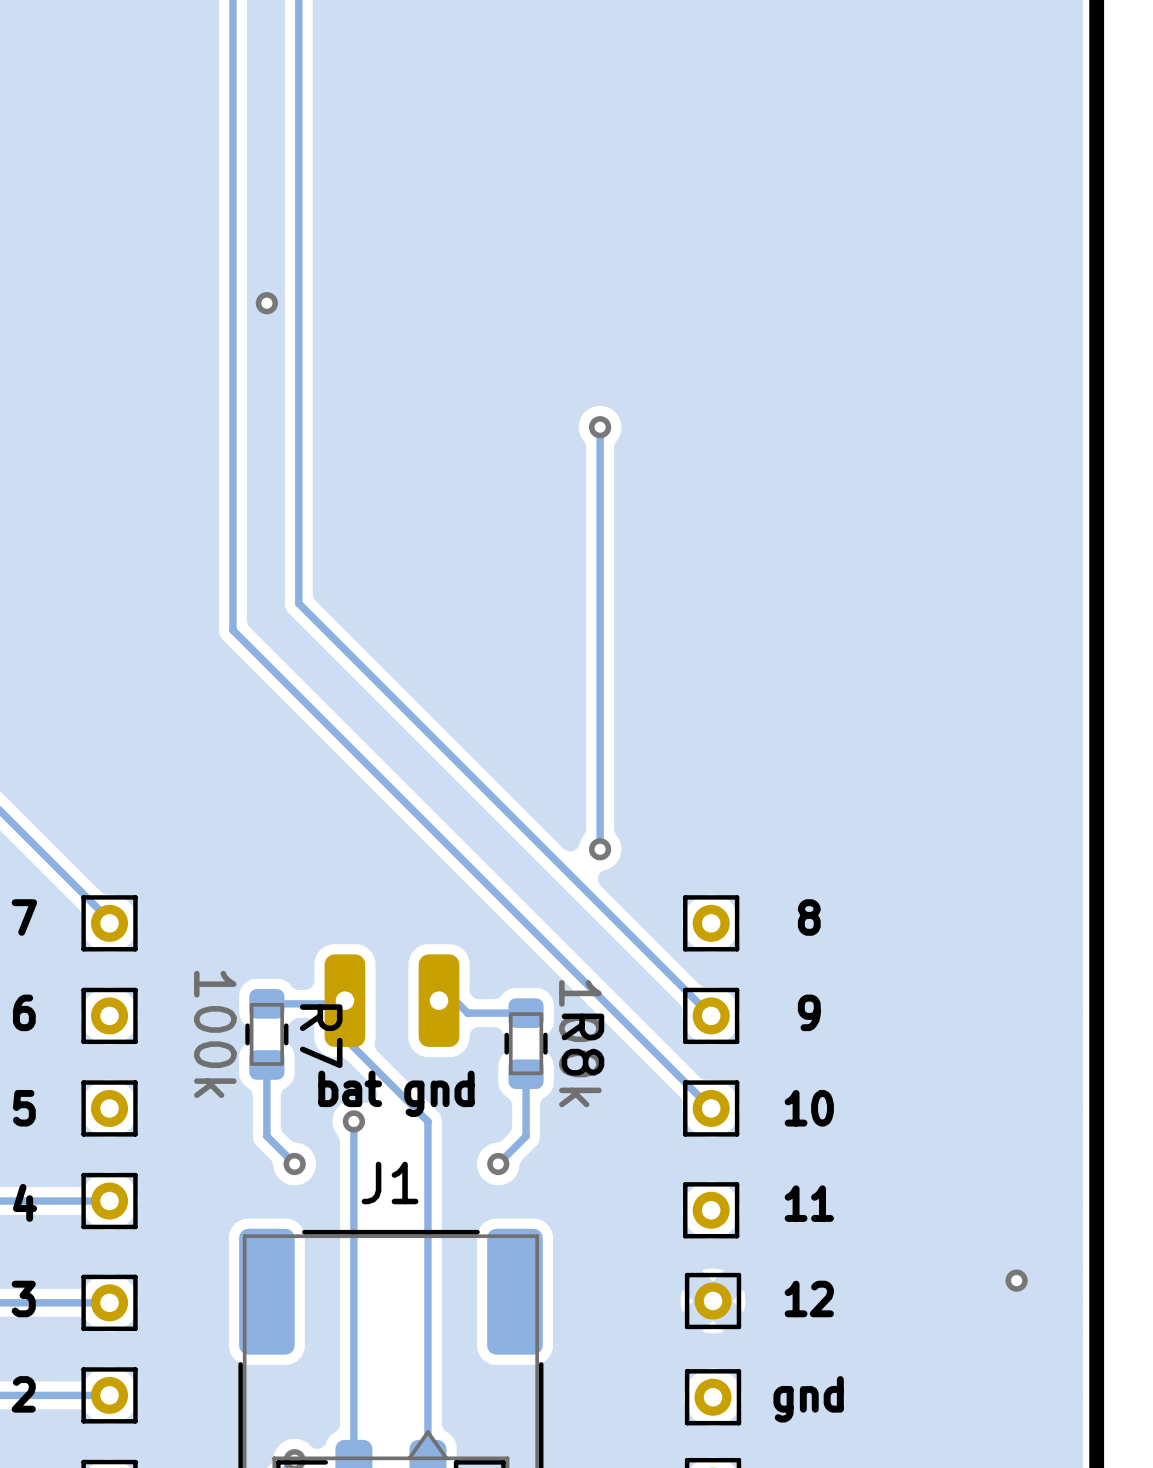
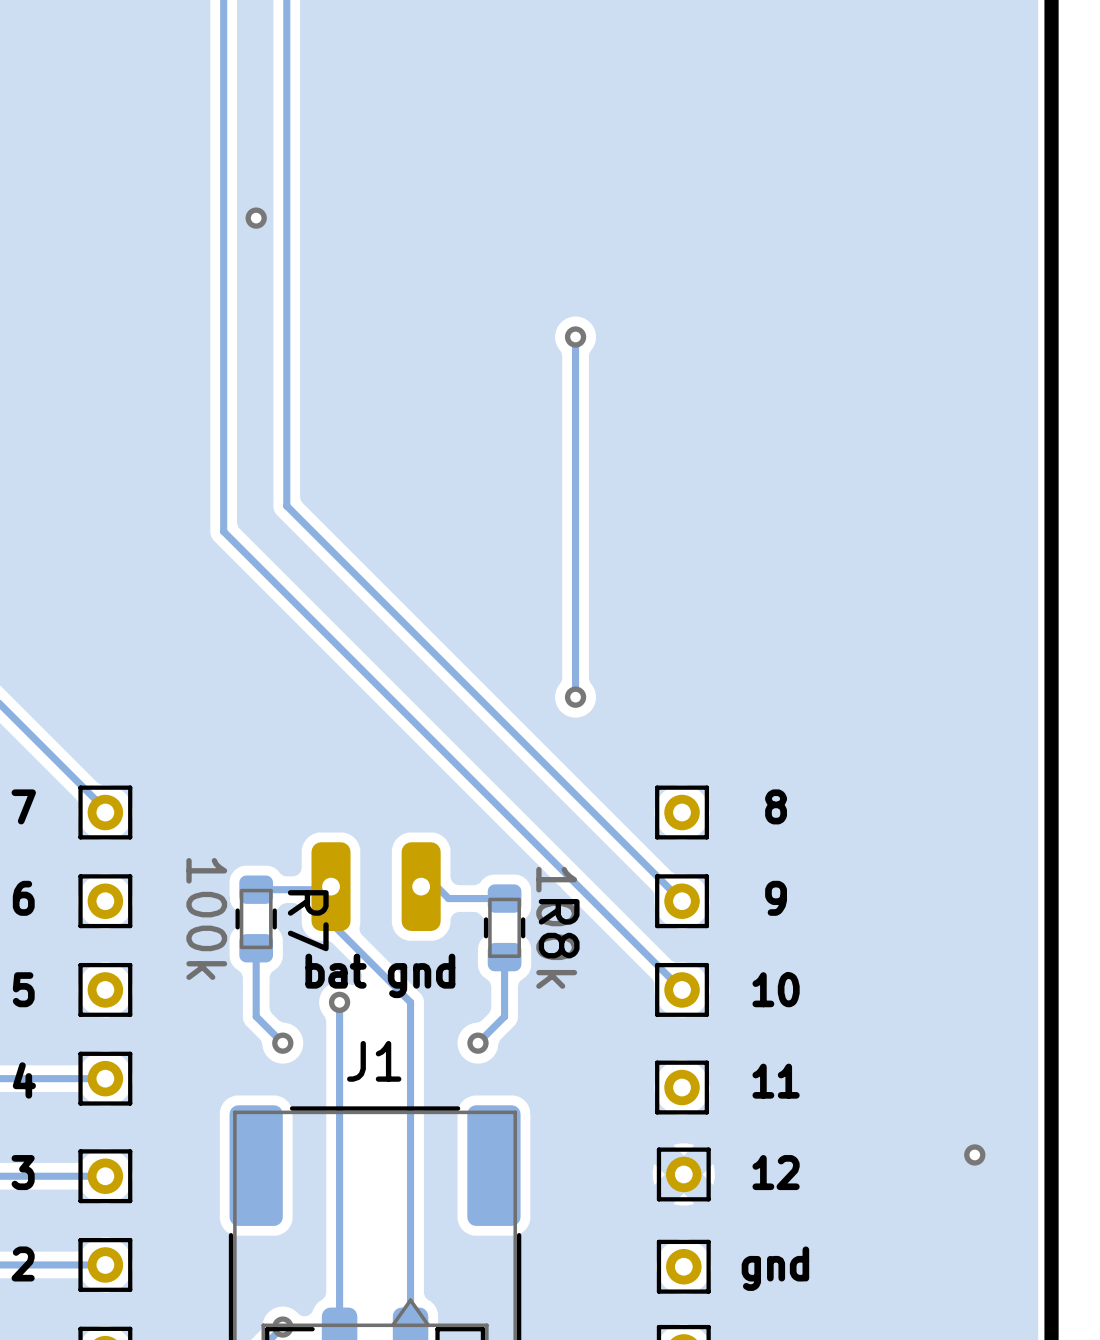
track: (600, 803) (600, 849) -> none
via position: (600, 849) -> (575, 697)

